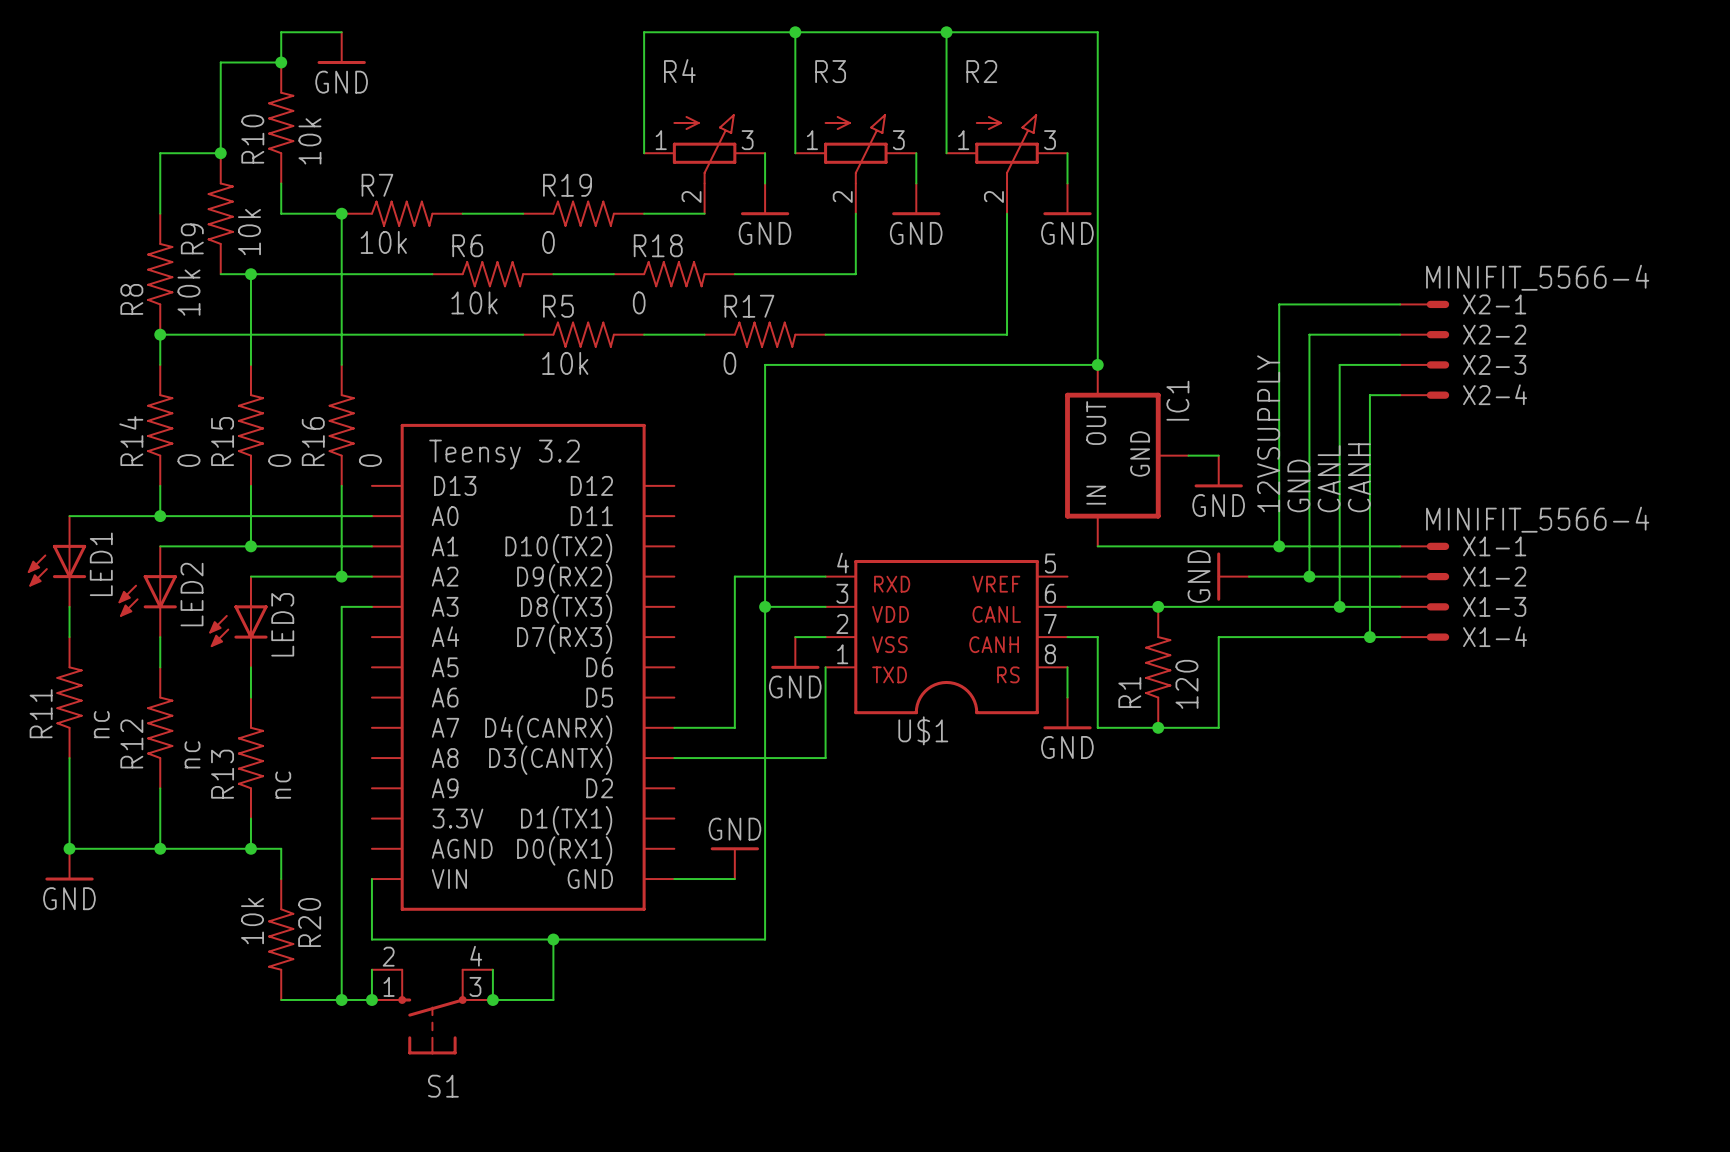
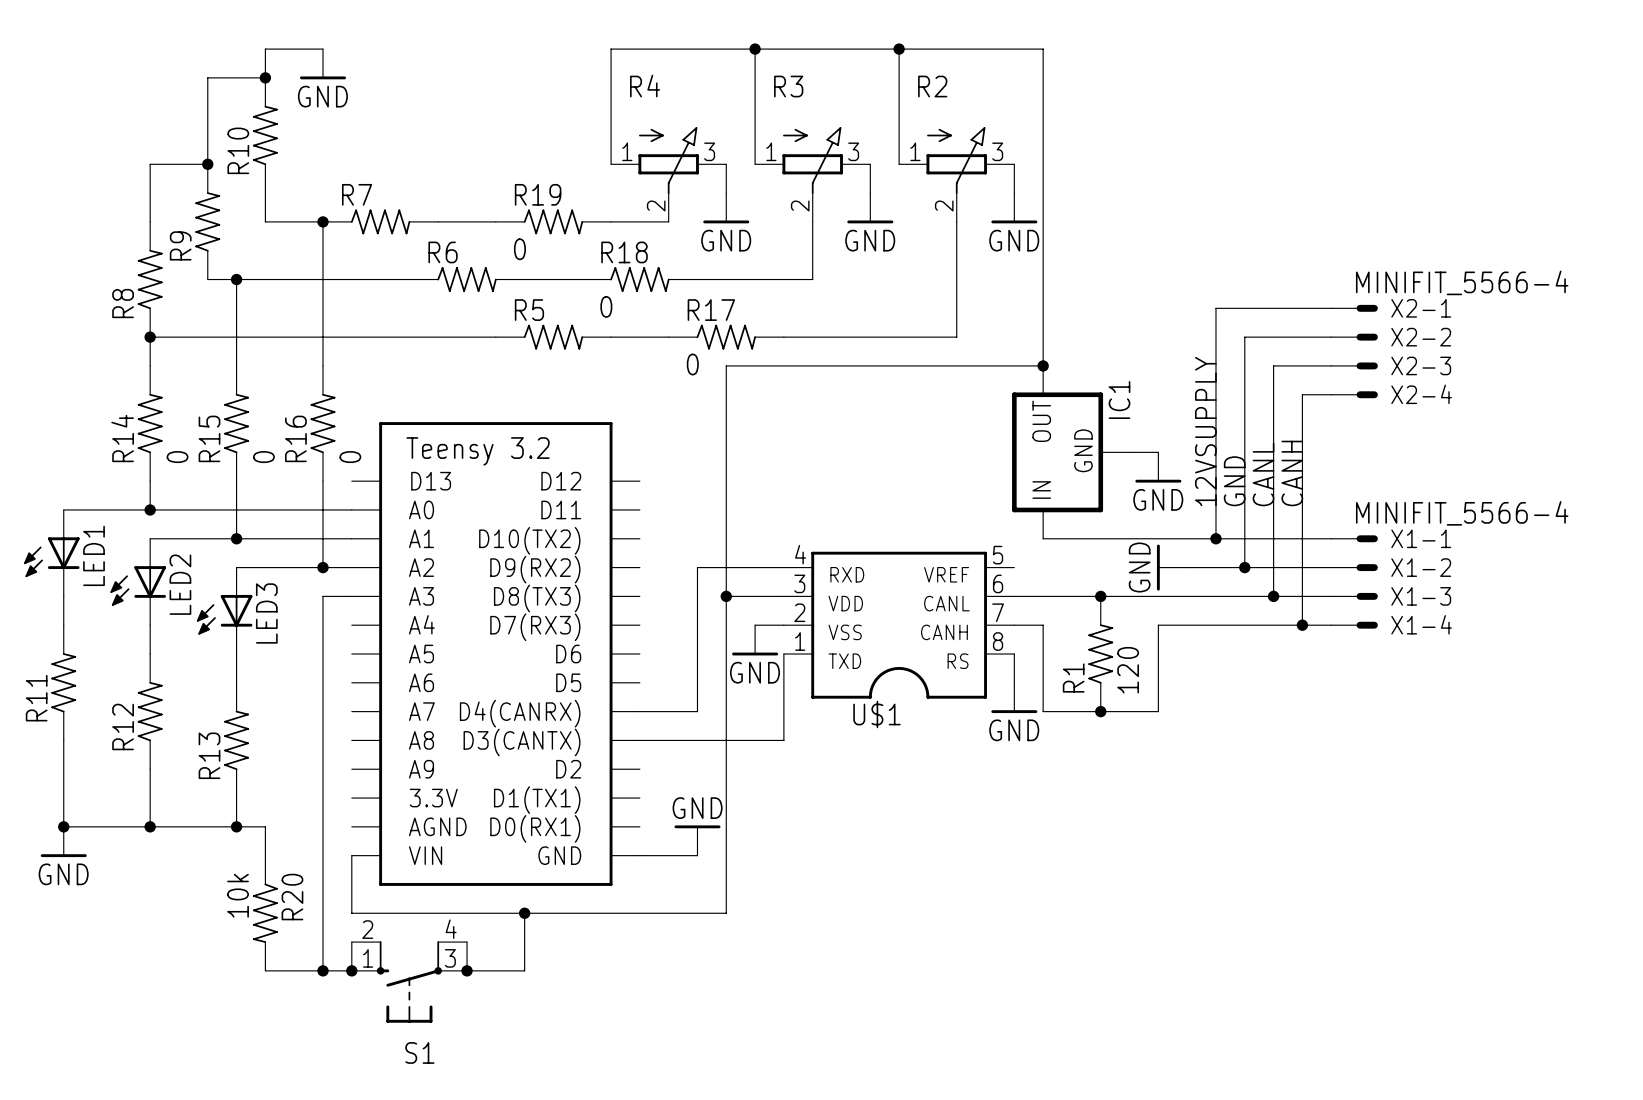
R10 value: 10k (309, 141) -> none
R9 value: 10k (249, 232) -> none
R7 value: 10k (383, 242) -> none
R8 value: 10k (188, 292) -> none
R6 value: 10k (474, 302) -> none
R5 value: 10k (565, 363) -> none
R11 value: nc (101, 724) -> none
R12 value: nc (192, 754) -> none
R13 value: nc (283, 785) -> none

